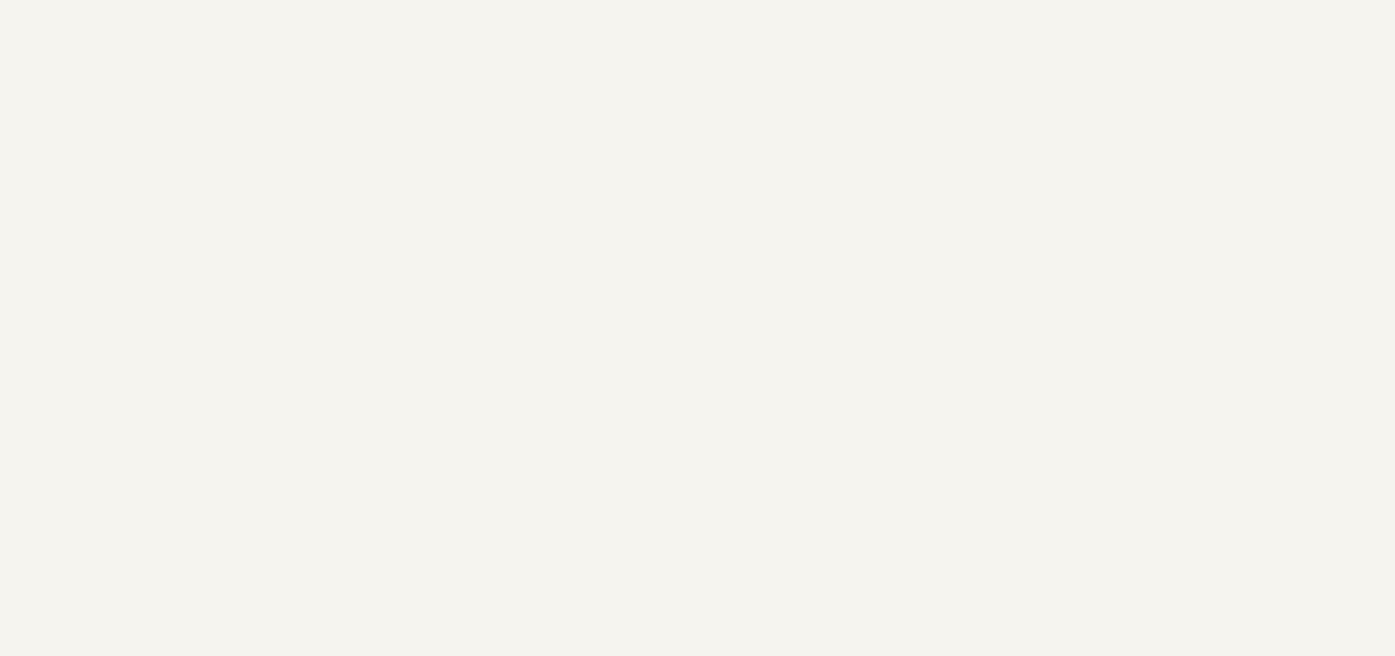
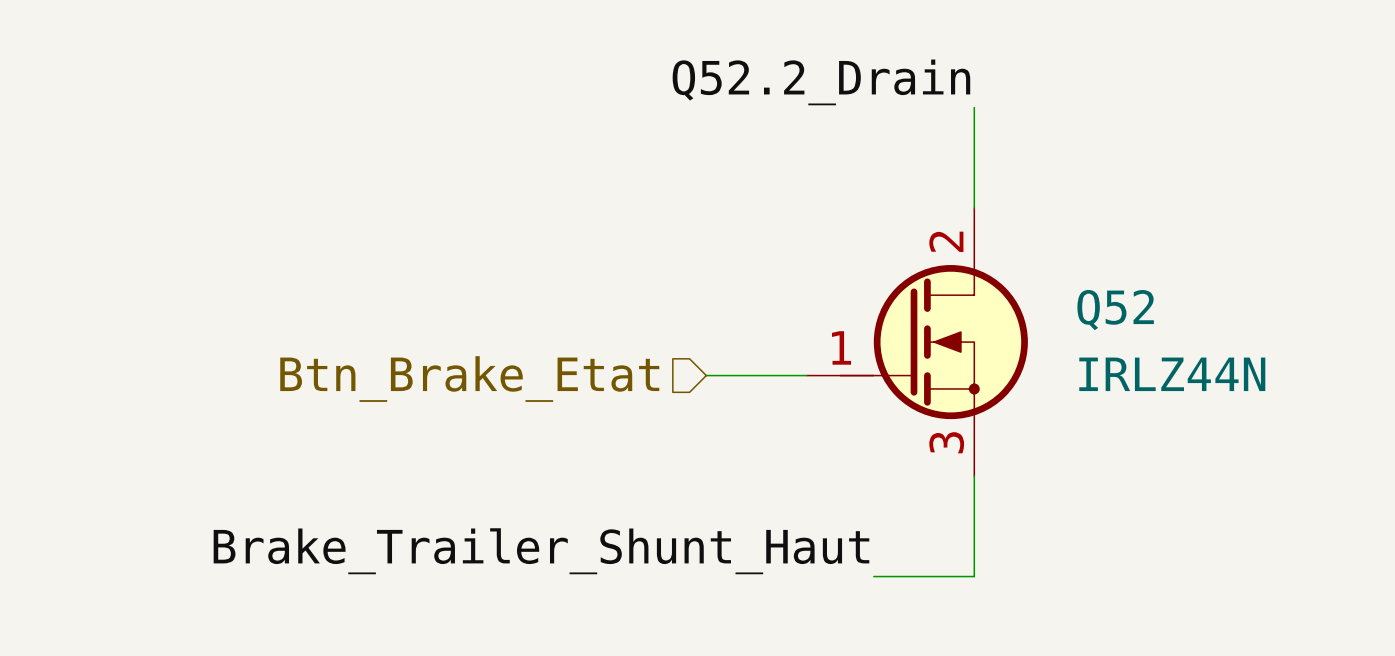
label: none -> Q52.2_Drain (821, 82)
wire: none -> (974, 107) (974, 208)
Q52: none -> IRLZ44N (917, 342)
wire: none -> (706, 375) (806, 375)
hierarchical label: none -> Btn_Brake_Etat (469, 379)
wire: none -> (974, 476) (974, 576) (873, 576)
label: none -> Brake_Trailer_Shunt_Haut (541, 551)

